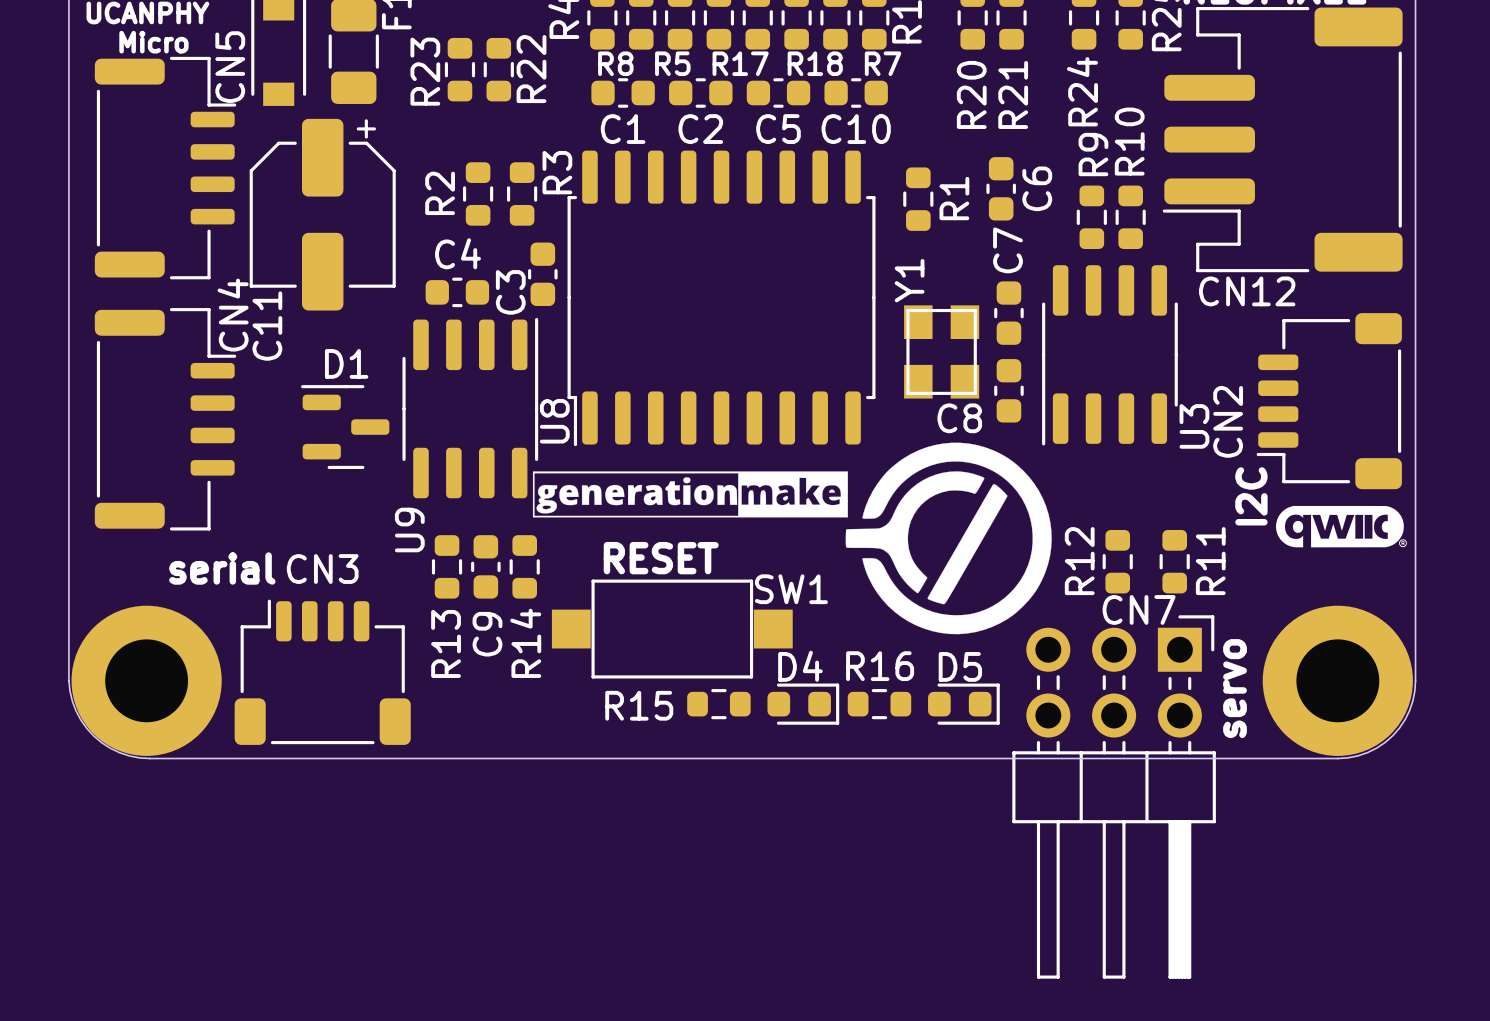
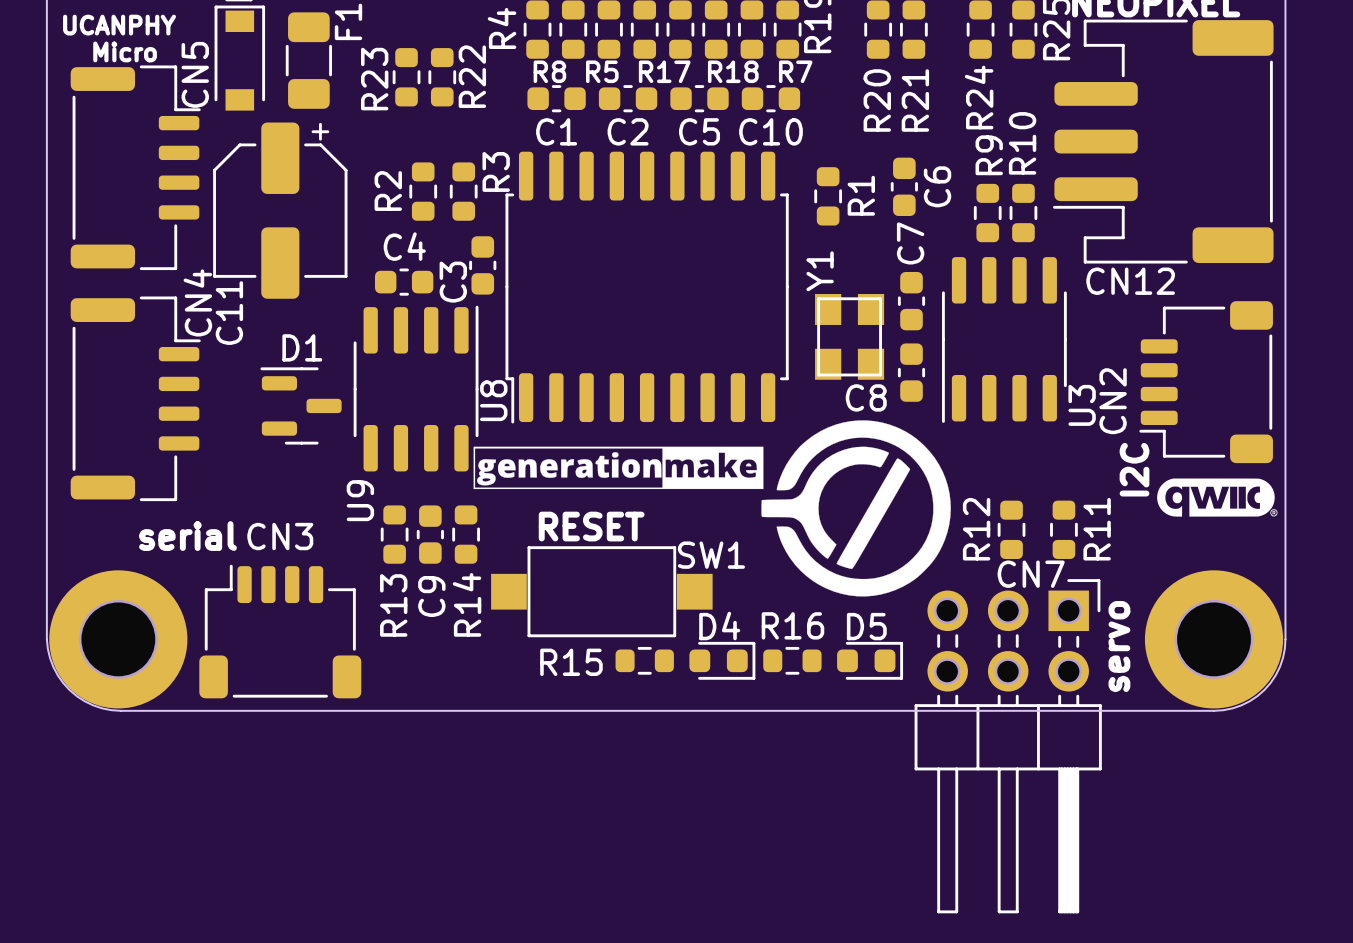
drawing: none -> [934, 597, 961, 624]
drawing: none -> [994, 597, 1022, 624]
drawing: none -> [1055, 597, 1082, 624]
drawing: none -> [79, 600, 158, 679]
drawing: none -> [1174, 600, 1254, 679]
drawing: none -> [934, 658, 961, 685]
drawing: none -> [994, 658, 1022, 685]
drawing: none -> [1055, 658, 1082, 685]

